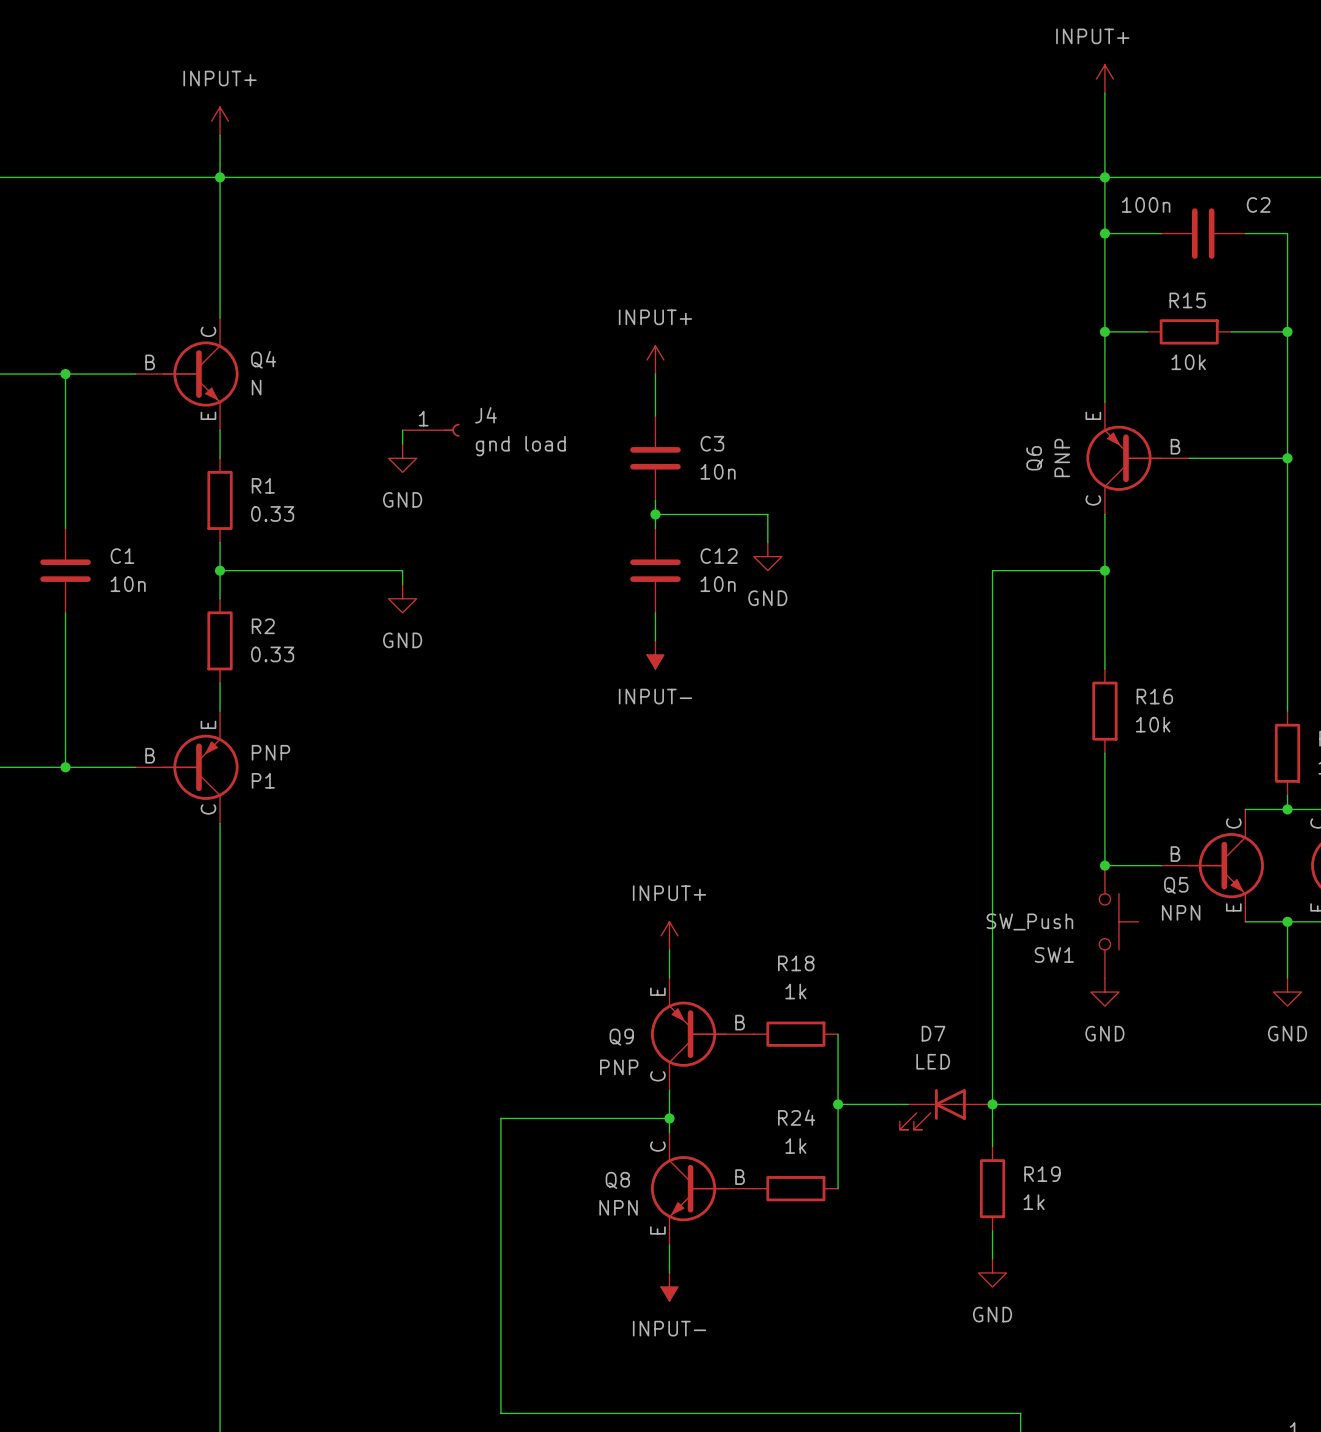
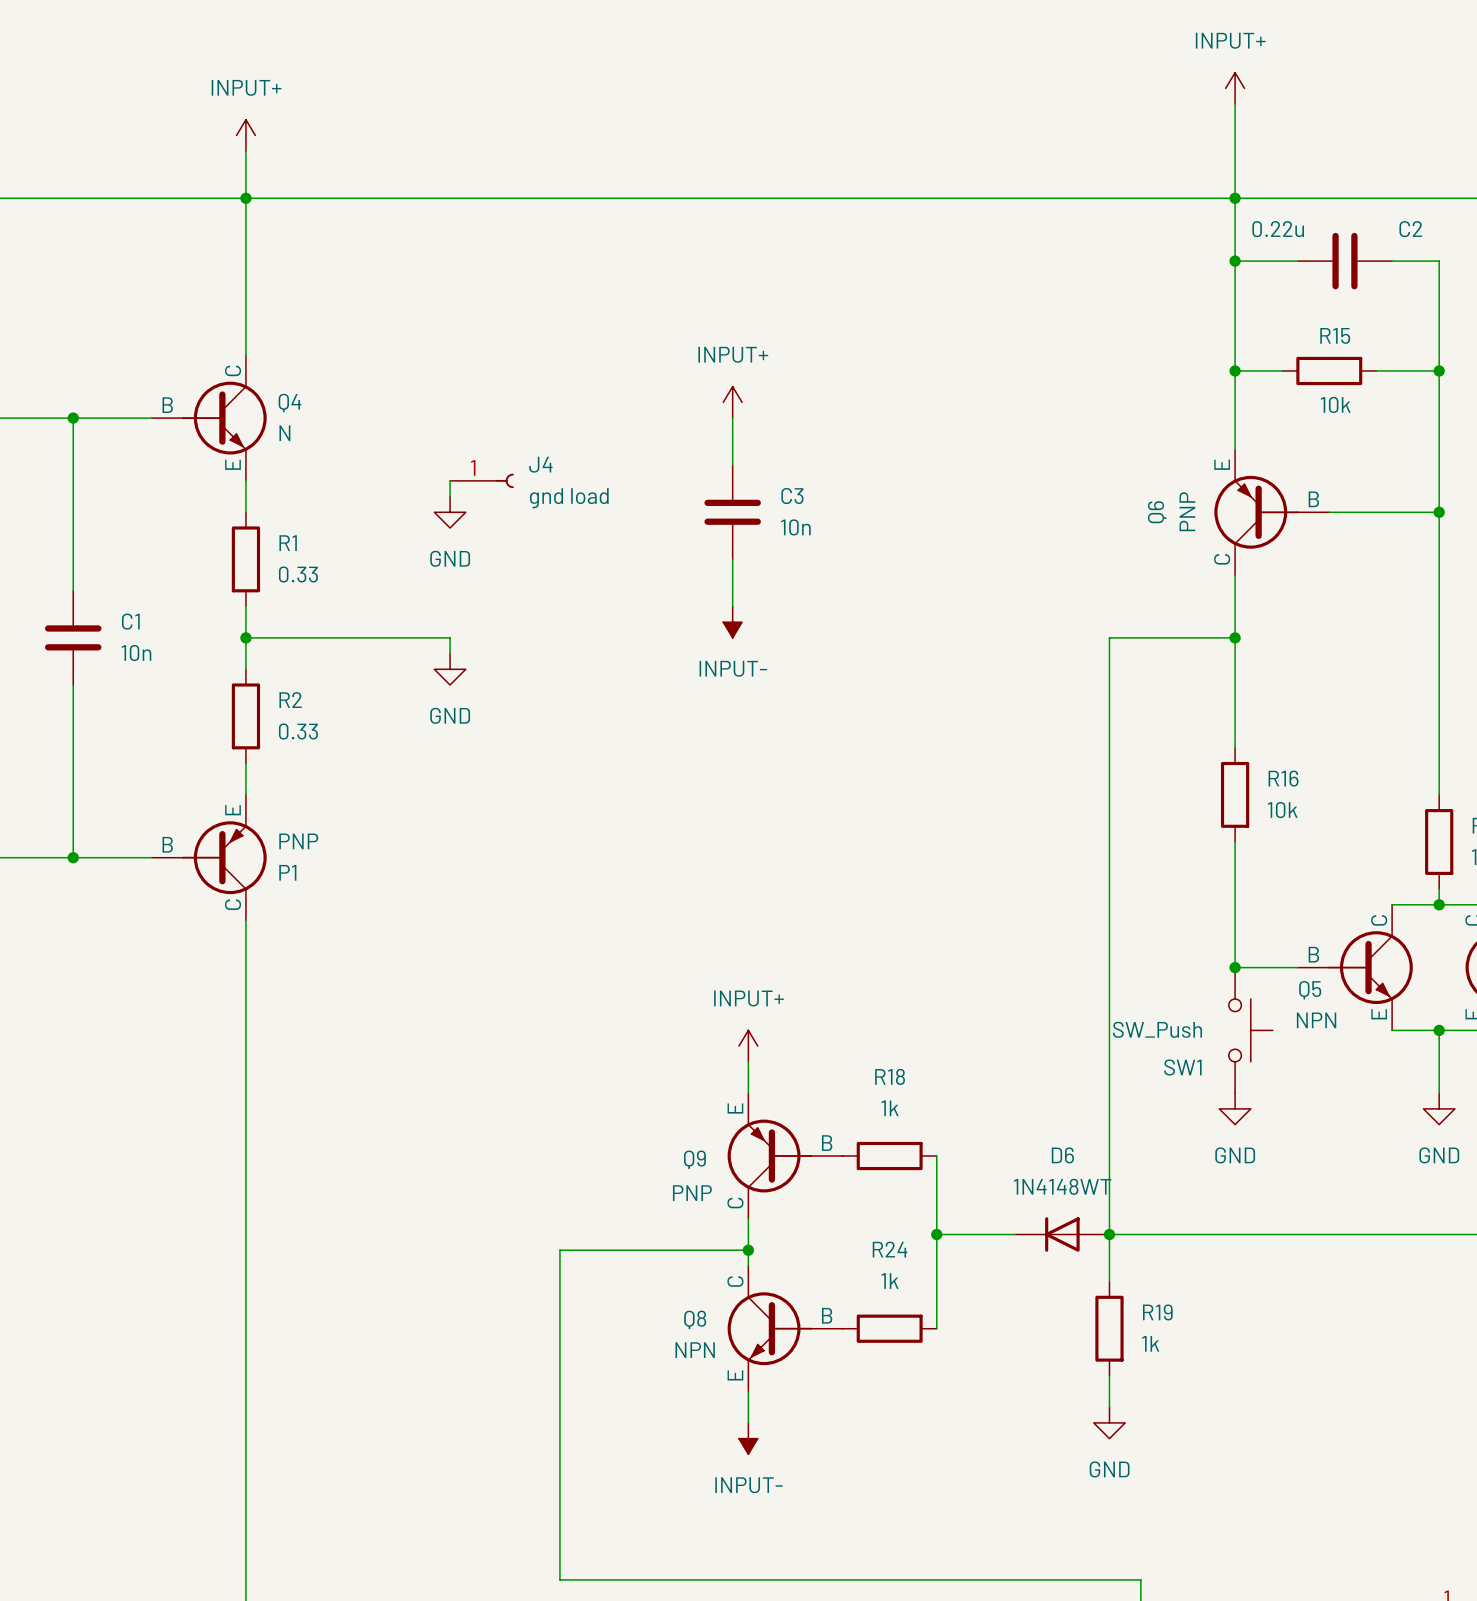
C2 value: 100n (1146, 204) -> 0.22u (1278, 229)
wire: (655, 514) (767, 514) (767, 542) -> none
junction: (655, 514) -> none
power symbol: GND (767, 556) -> none
C12: 10n (655, 570) -> none
wire: (655, 612) (655, 640) -> none
power symbol position: INPUT- (655, 654) -> INPUT- (732, 622)
D6: none -> 1N4148WT (1062, 1234)
D7: LED (946, 1109) -> none

